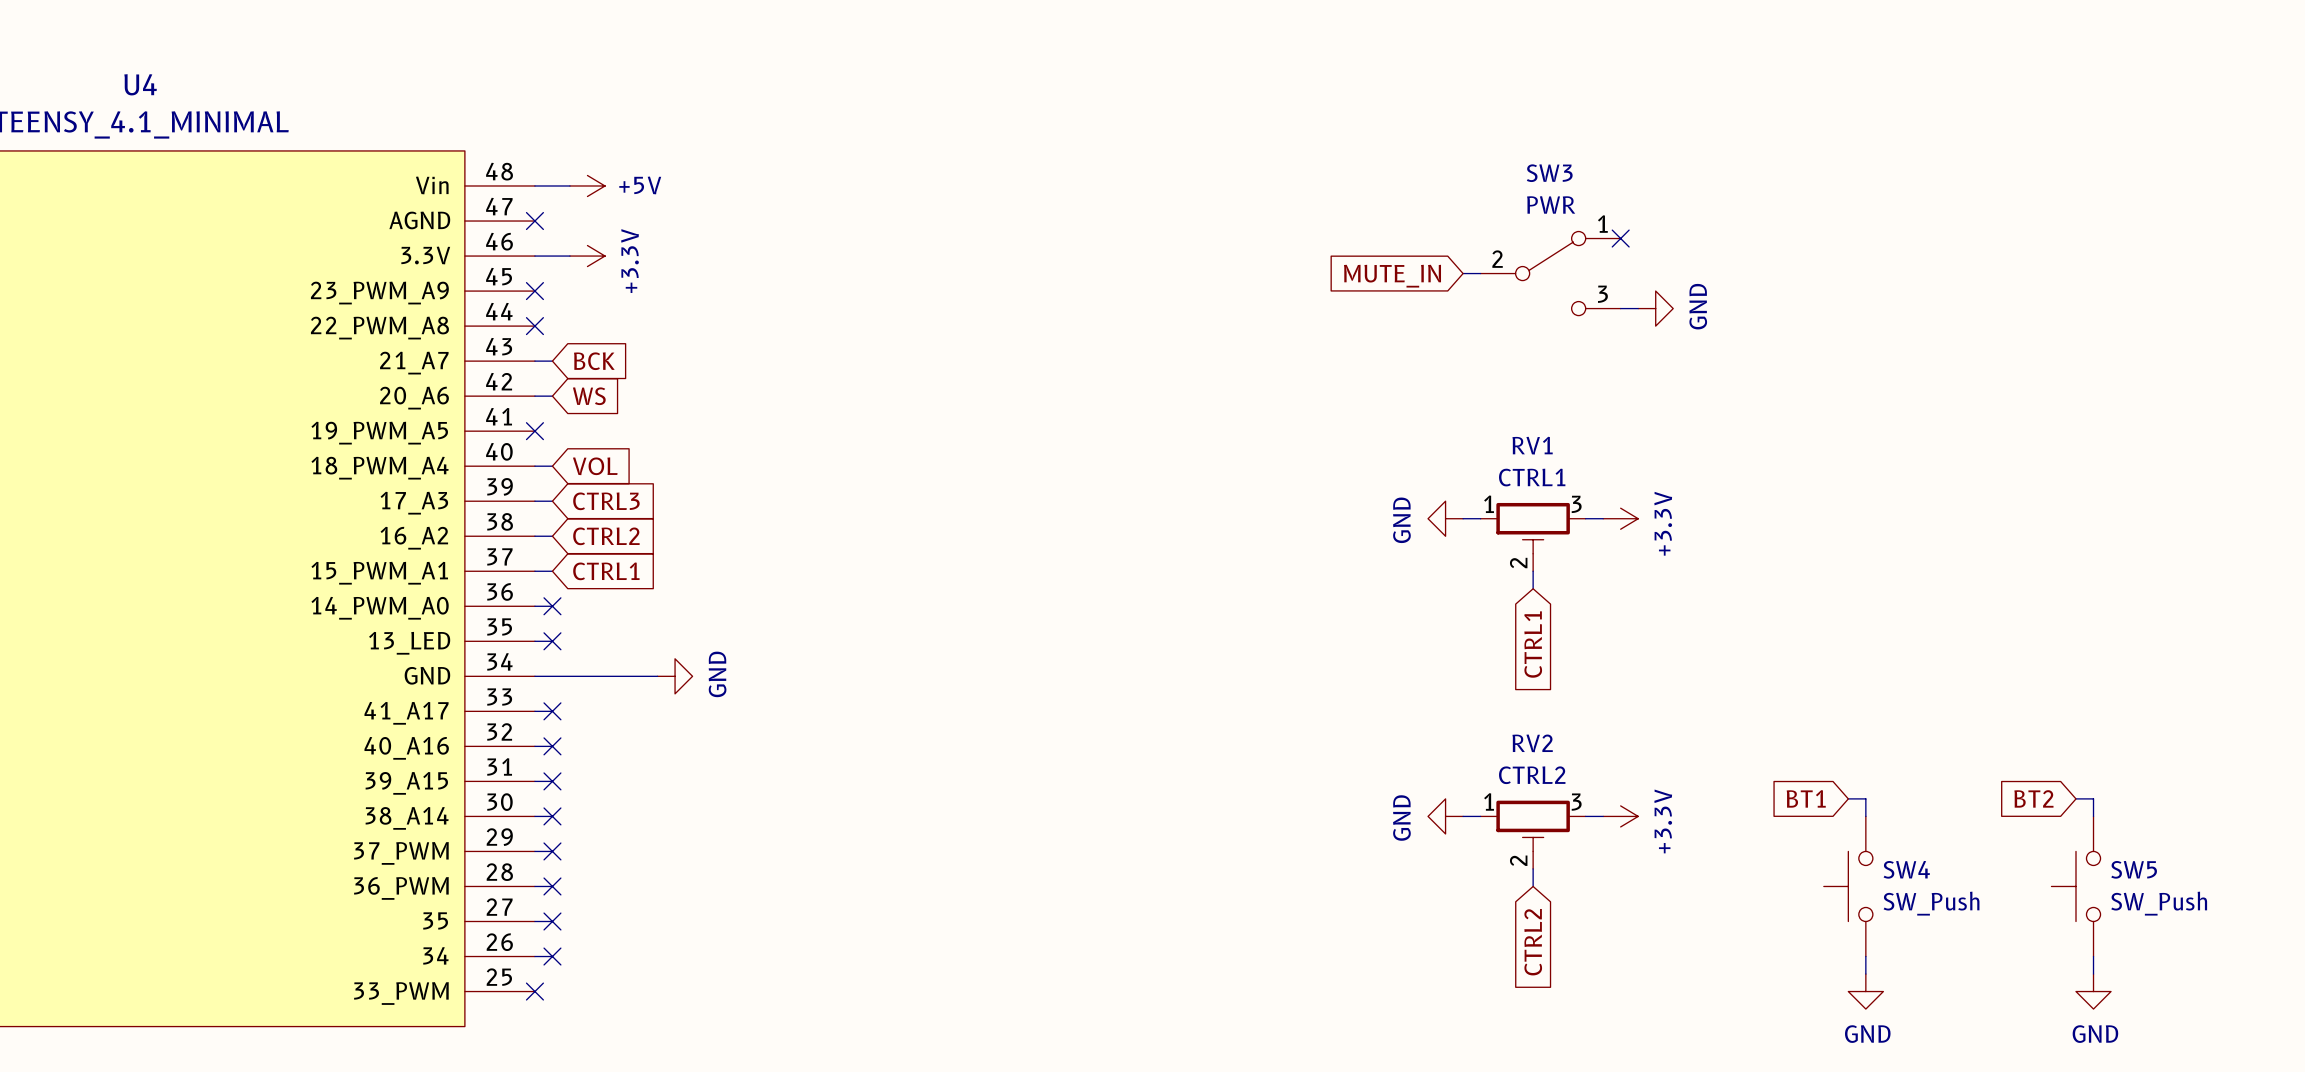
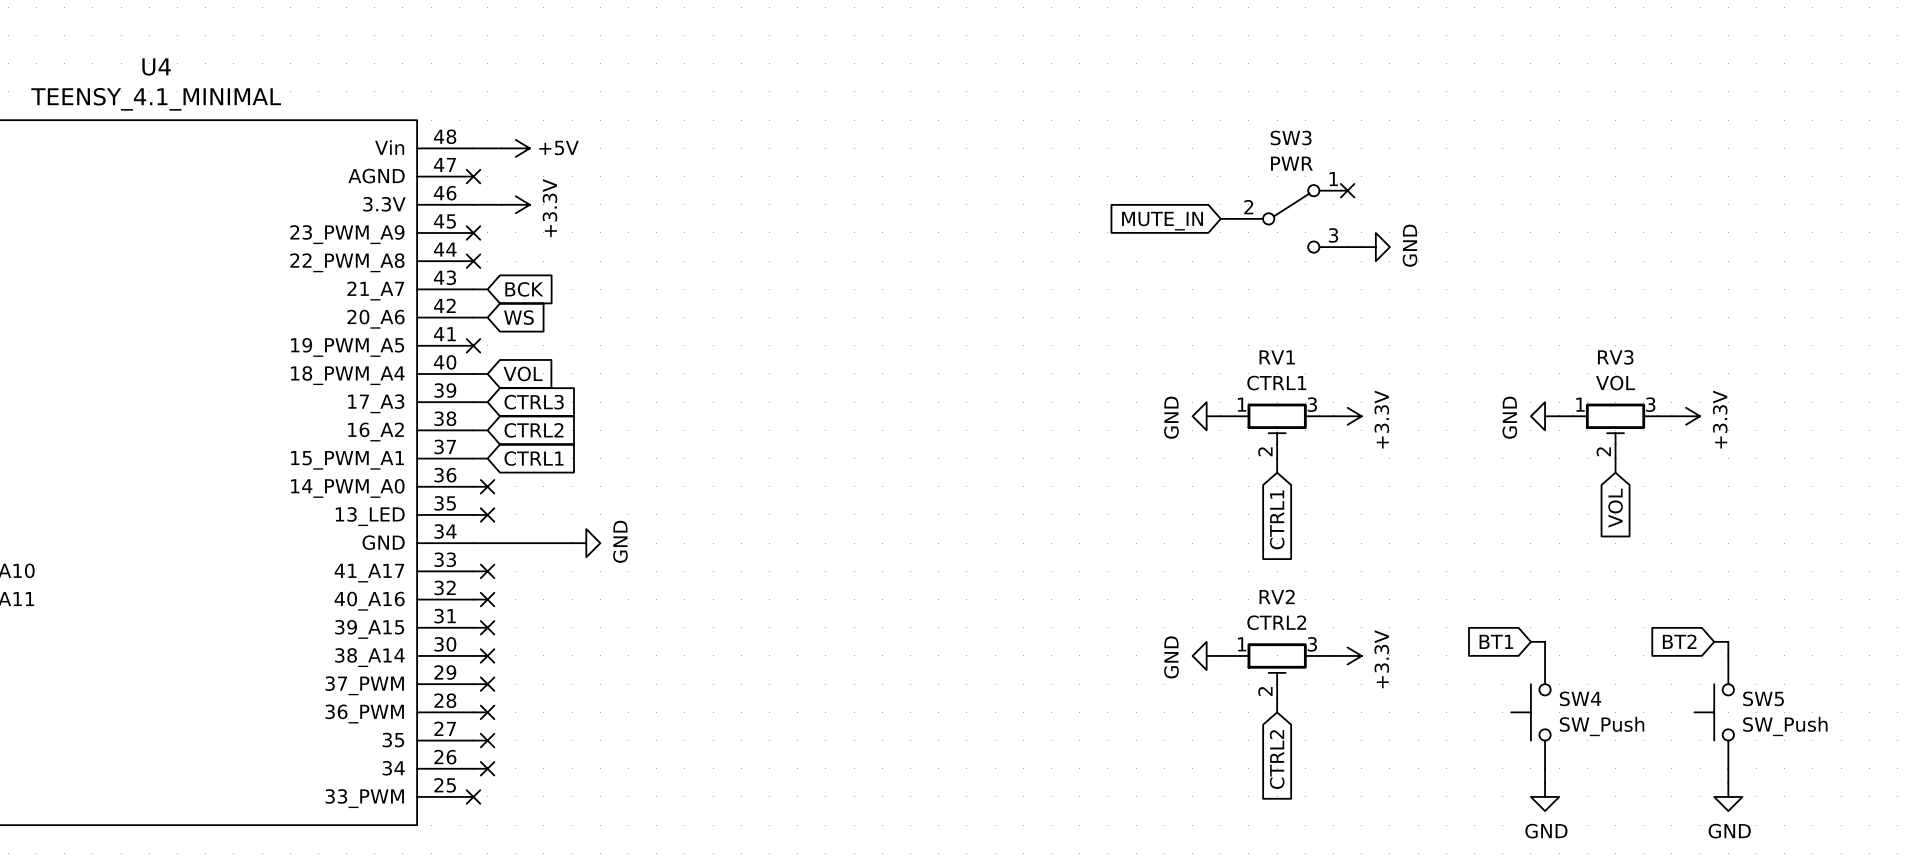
power symbol: none -> GND (1545, 416)
wire: none -> (1559, 416) (1573, 416)
wire: none -> (1657, 416) (1671, 416)
power symbol: none -> +3.3V (1686, 416)
RV3: none -> VOL (1615, 431)
wire: none -> (1615, 458) (1615, 472)
global label: none -> VOL (1615, 508)

